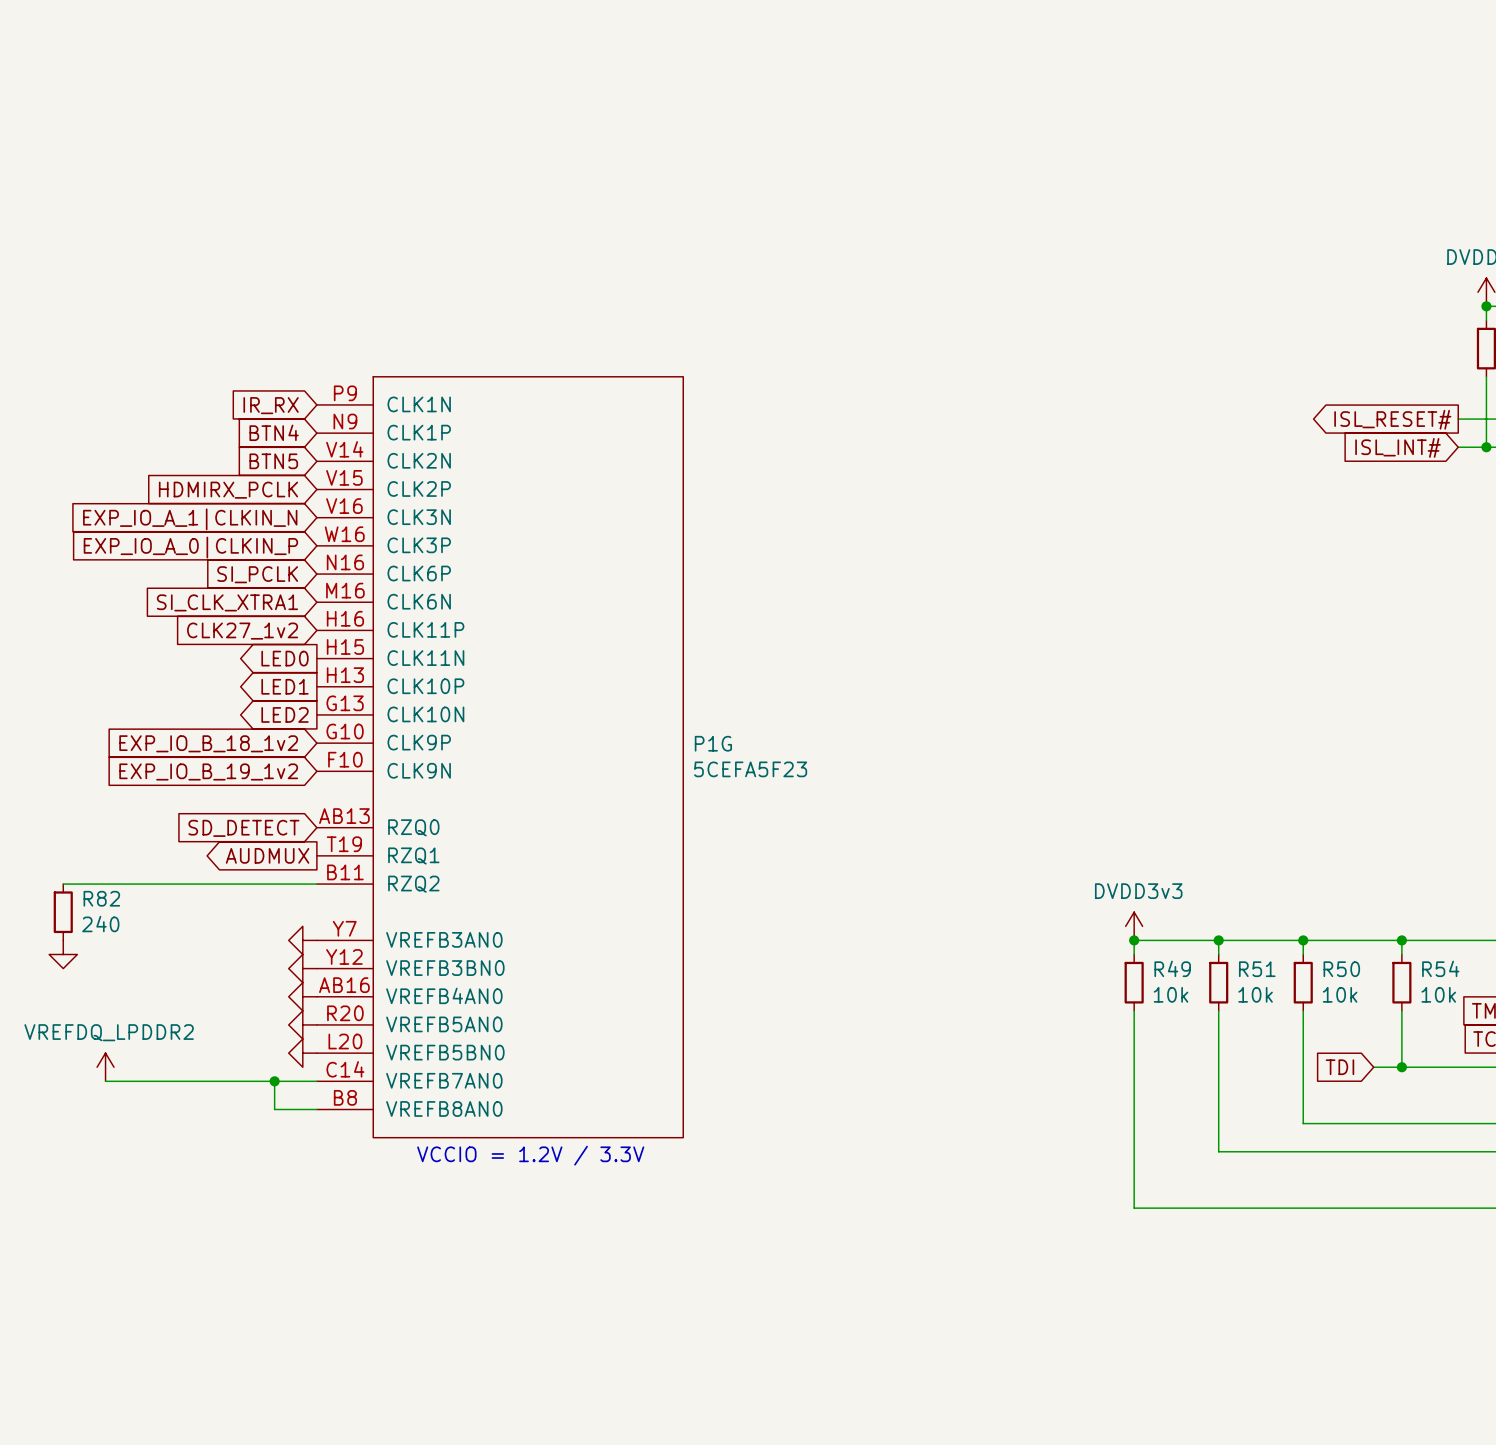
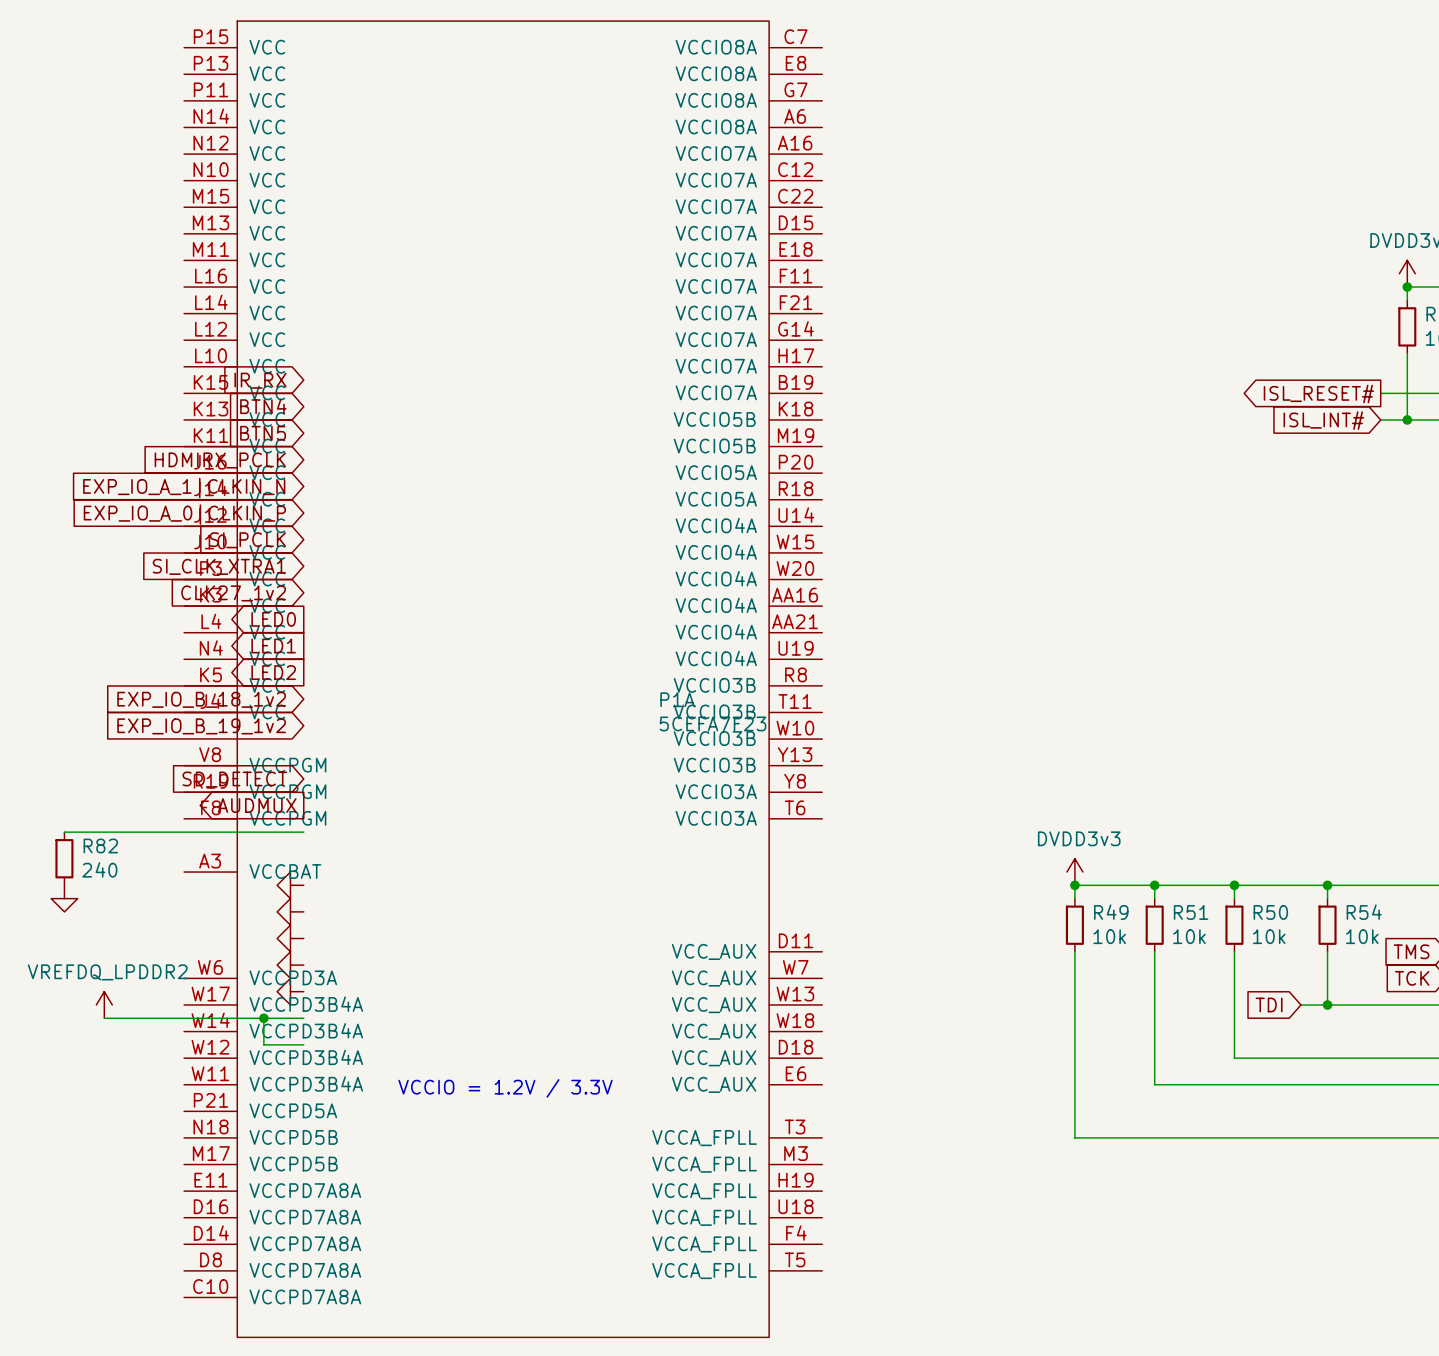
P1A: none -> 5CEFA7F23 (503, 679)
P1G: 5CEFA5F23 (500, 757) -> none

